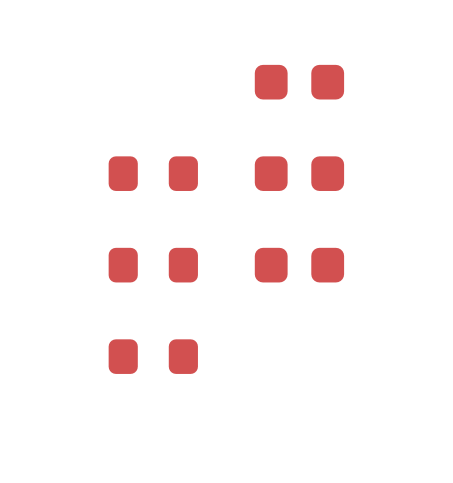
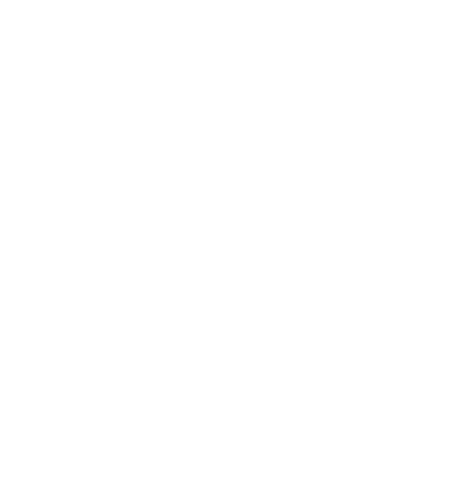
part: (299, 82) -> none
part: (153, 173) -> none
part: (299, 173) -> none
part: (153, 265) -> none
part: (299, 265) -> none
part: (153, 356) -> none

